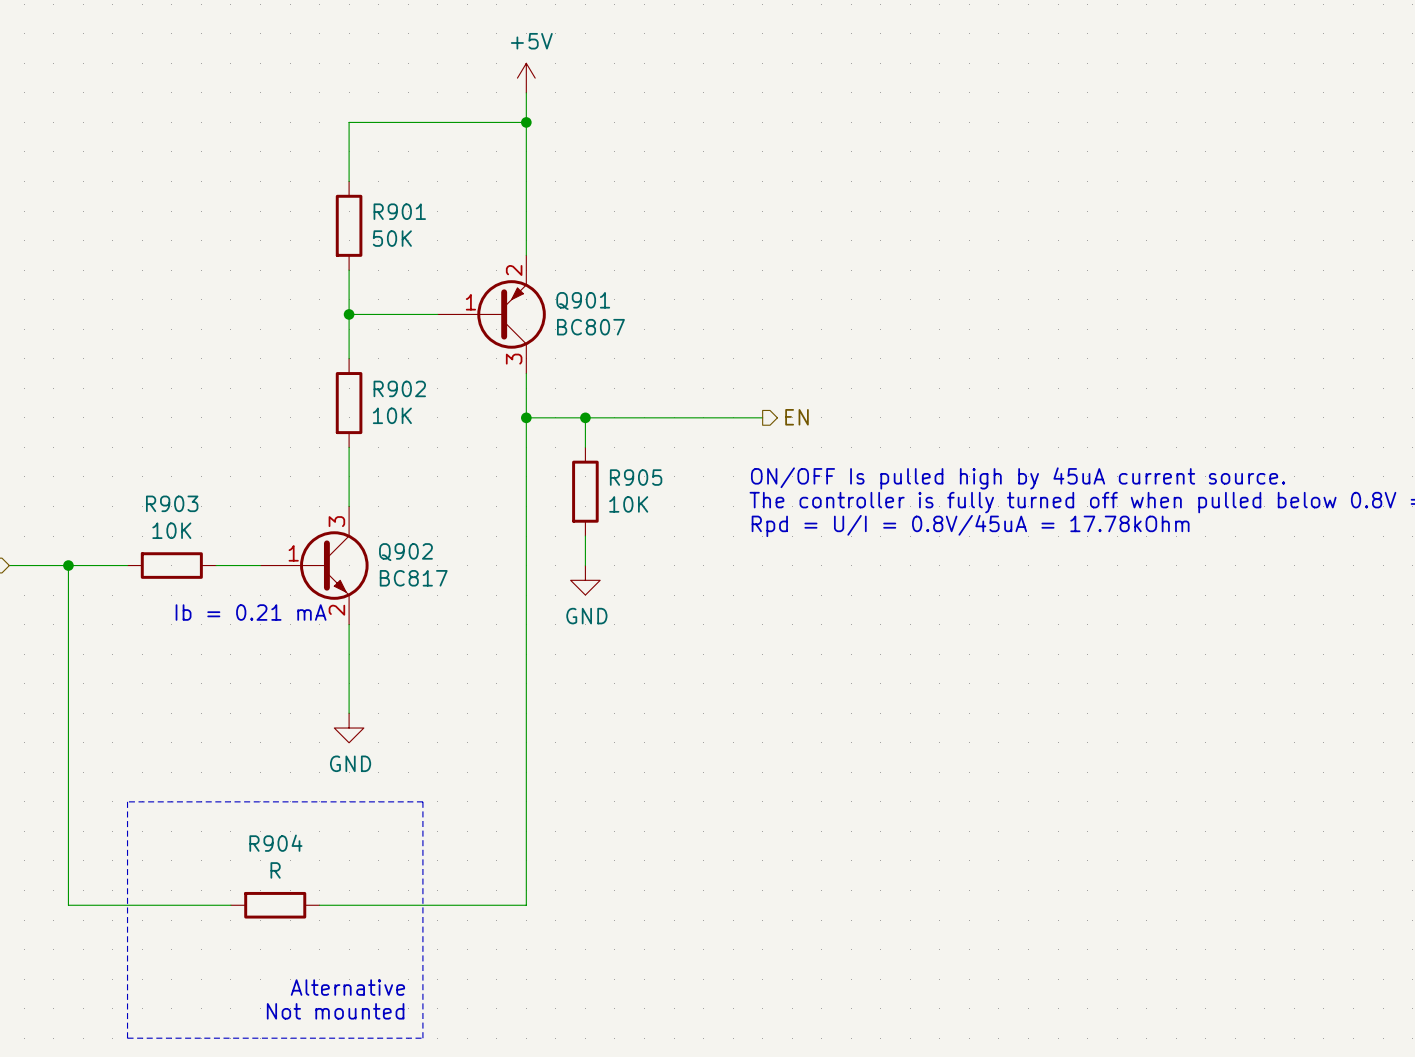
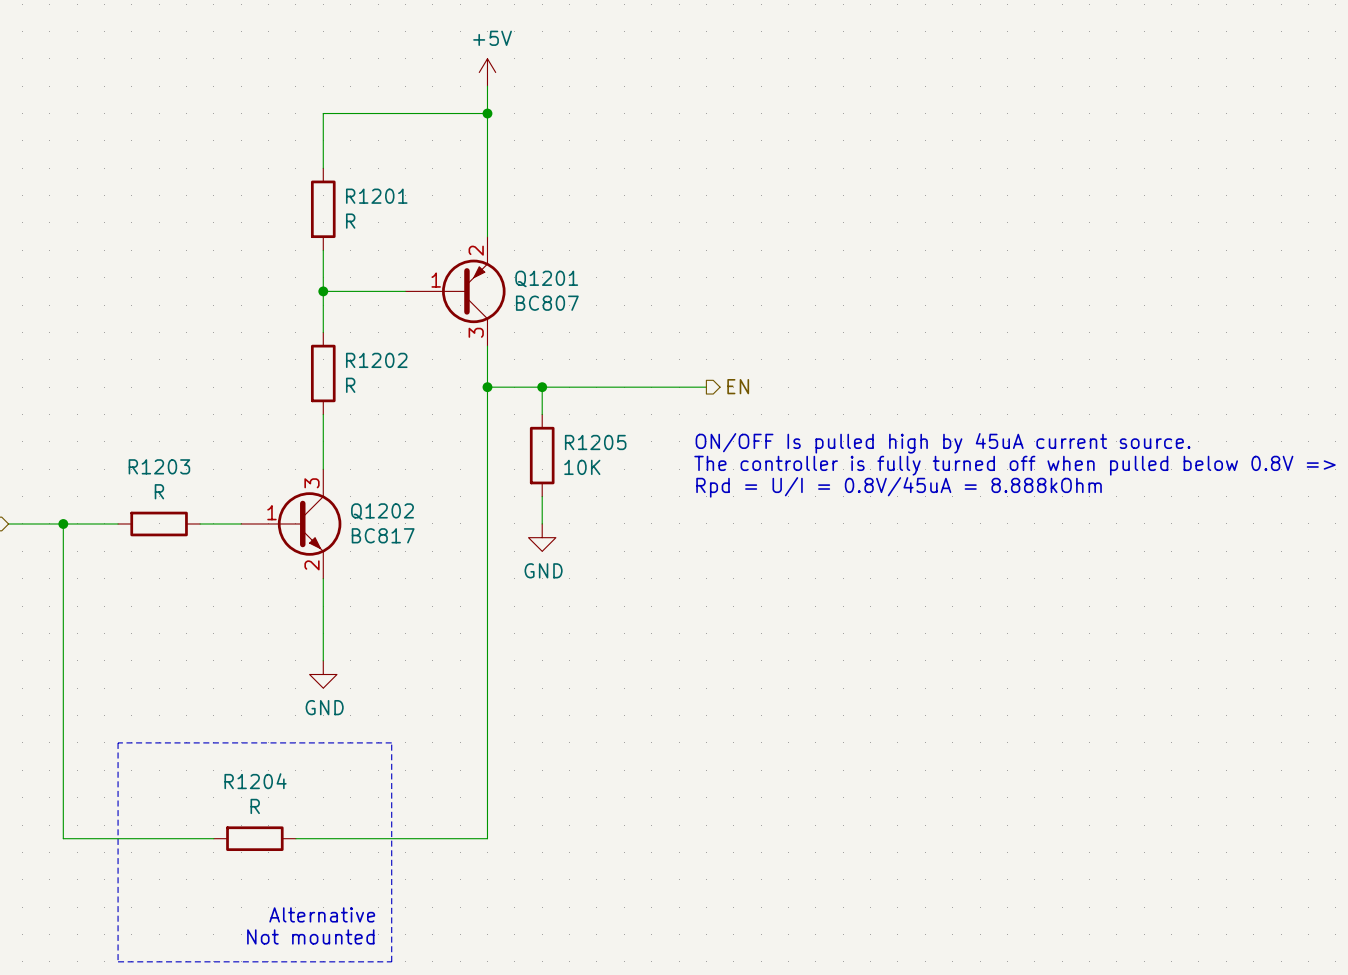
R901 name: R901 (399, 211) -> R1201 (376, 196)
R901 value: 50K (392, 238) -> R (350, 221)
Q901 name: Q901 (583, 301) -> Q1201 (546, 278)
R902 name: R902 (399, 388) -> R1202 (376, 360)
R902 value: 10K (392, 415) -> R (350, 385)
R905 name: R905 (636, 477) -> R1205 (595, 442)
R903 name: R903 (172, 503) -> R1203 (159, 466)
text: Rpd = U/I = 0.8V/45uA = 17.78kOhm (970, 526) -> Rpd = U/I = 0.8V/45uA = 8.888kOhm (899, 487)
R903 value: 10K (171, 530) -> R (159, 491)
Q902 name: Q902 (405, 552) -> Q1202 (382, 511)
text: Ib = 0.21 mA (251, 612) -> none
R904 name: R904 (275, 843) -> R1204 (255, 781)

